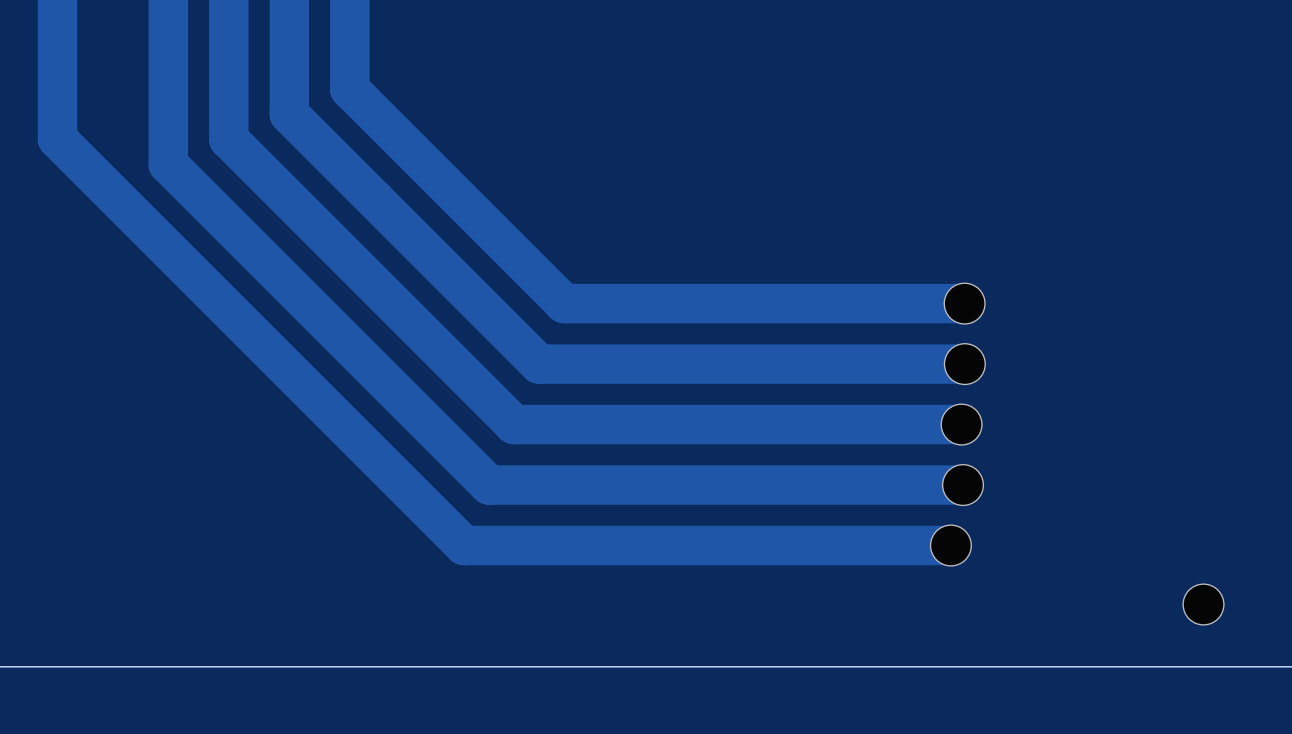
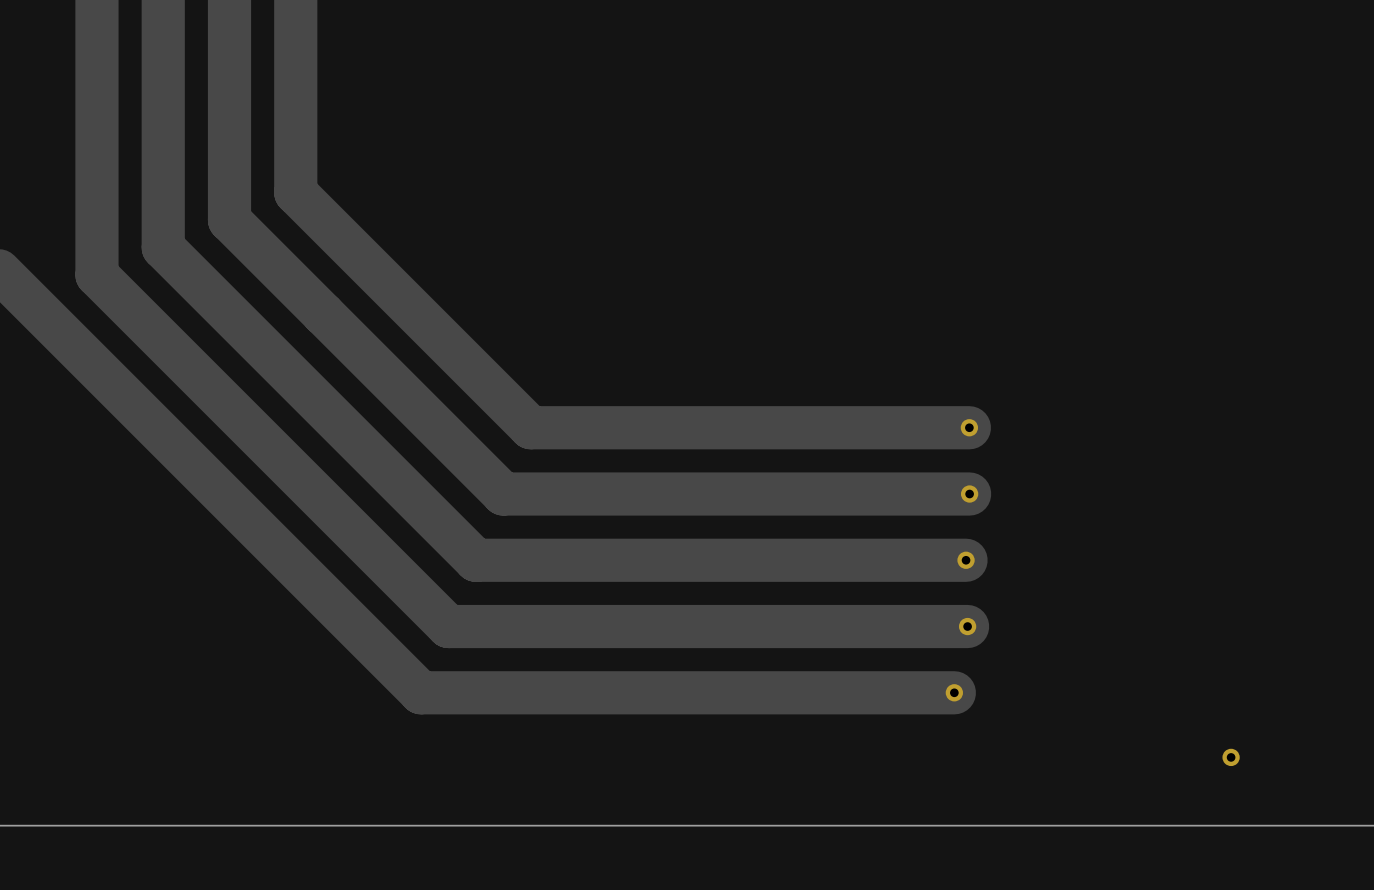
via size: [943, 282, 986, 325] -> [960, 419, 979, 437]
via size: [943, 343, 986, 386] -> [960, 485, 979, 503]
via size: [940, 403, 983, 446] -> [957, 551, 975, 569]
via size: [941, 464, 985, 507] -> [958, 617, 977, 636]
via size: [929, 524, 972, 567] -> [945, 684, 963, 702]
via size: [1182, 583, 1225, 626] -> [1222, 748, 1240, 767]

